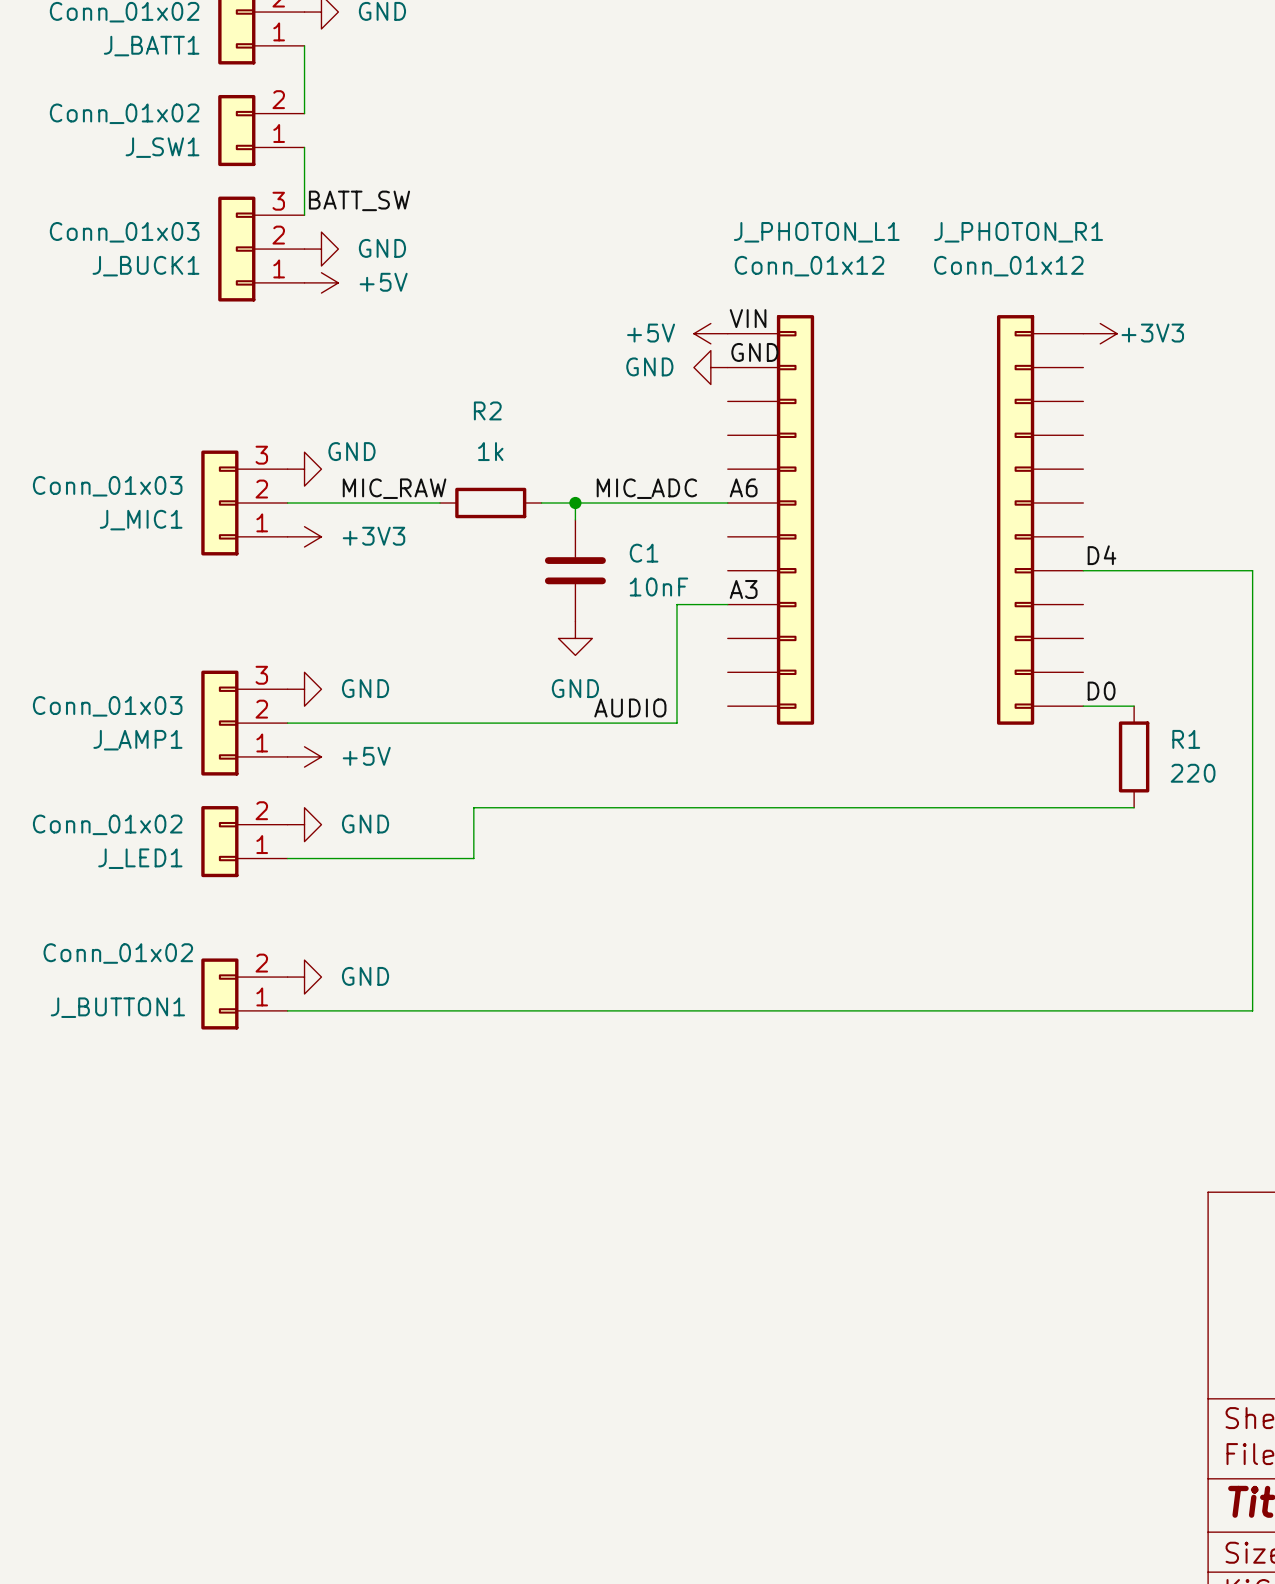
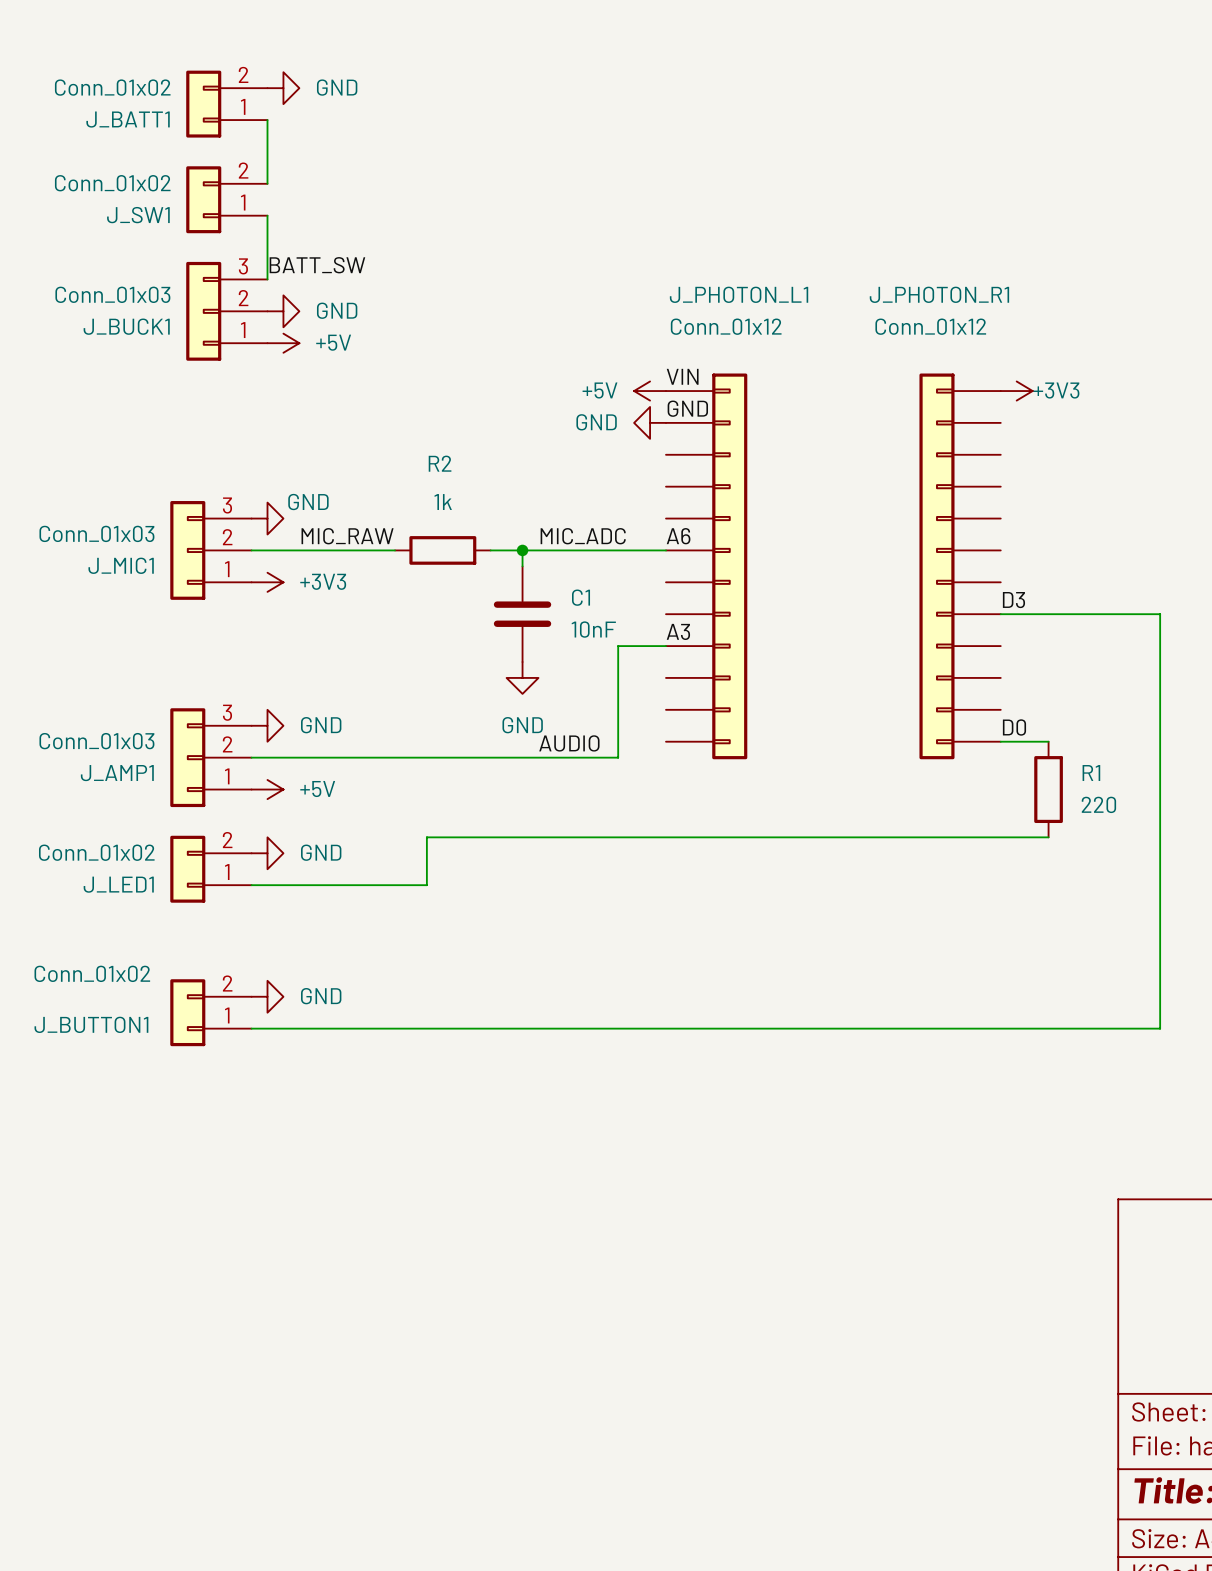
label: D4 (1101, 555) -> D3 (1013, 600)

